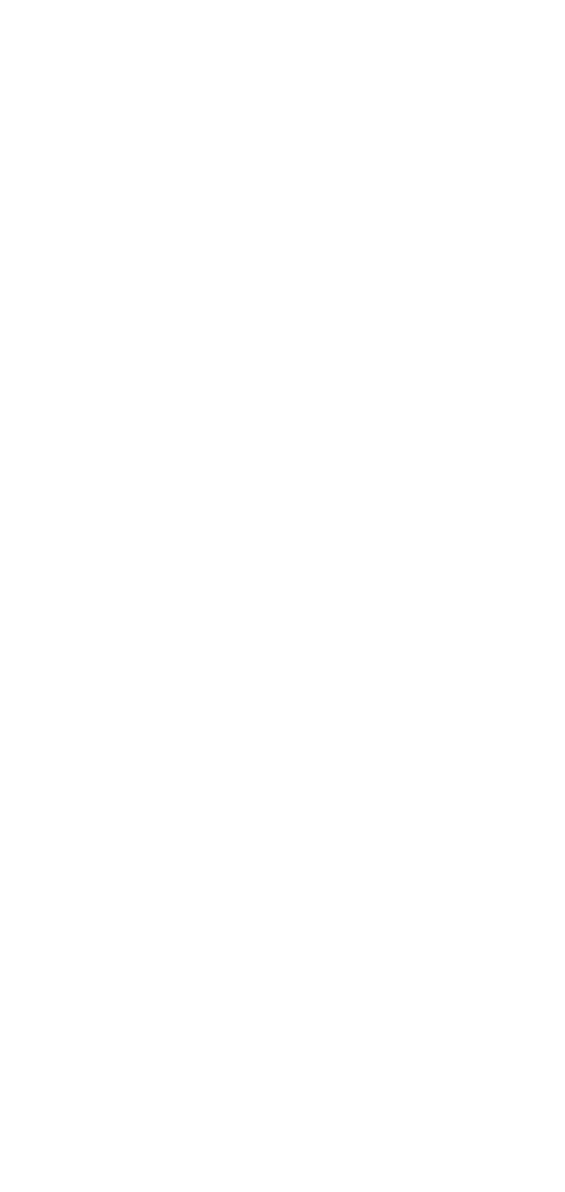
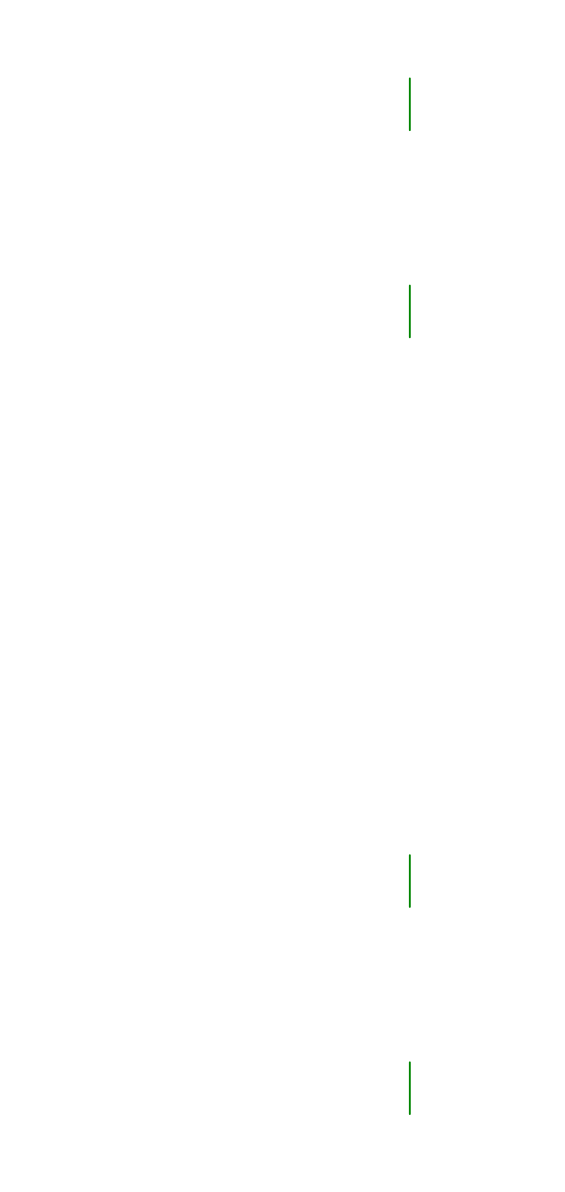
wire: none -> (409, 78) (409, 130)
wire: none -> (409, 285) (409, 337)
wire: none -> (409, 855) (409, 906)
wire: none -> (409, 1062) (409, 1114)

